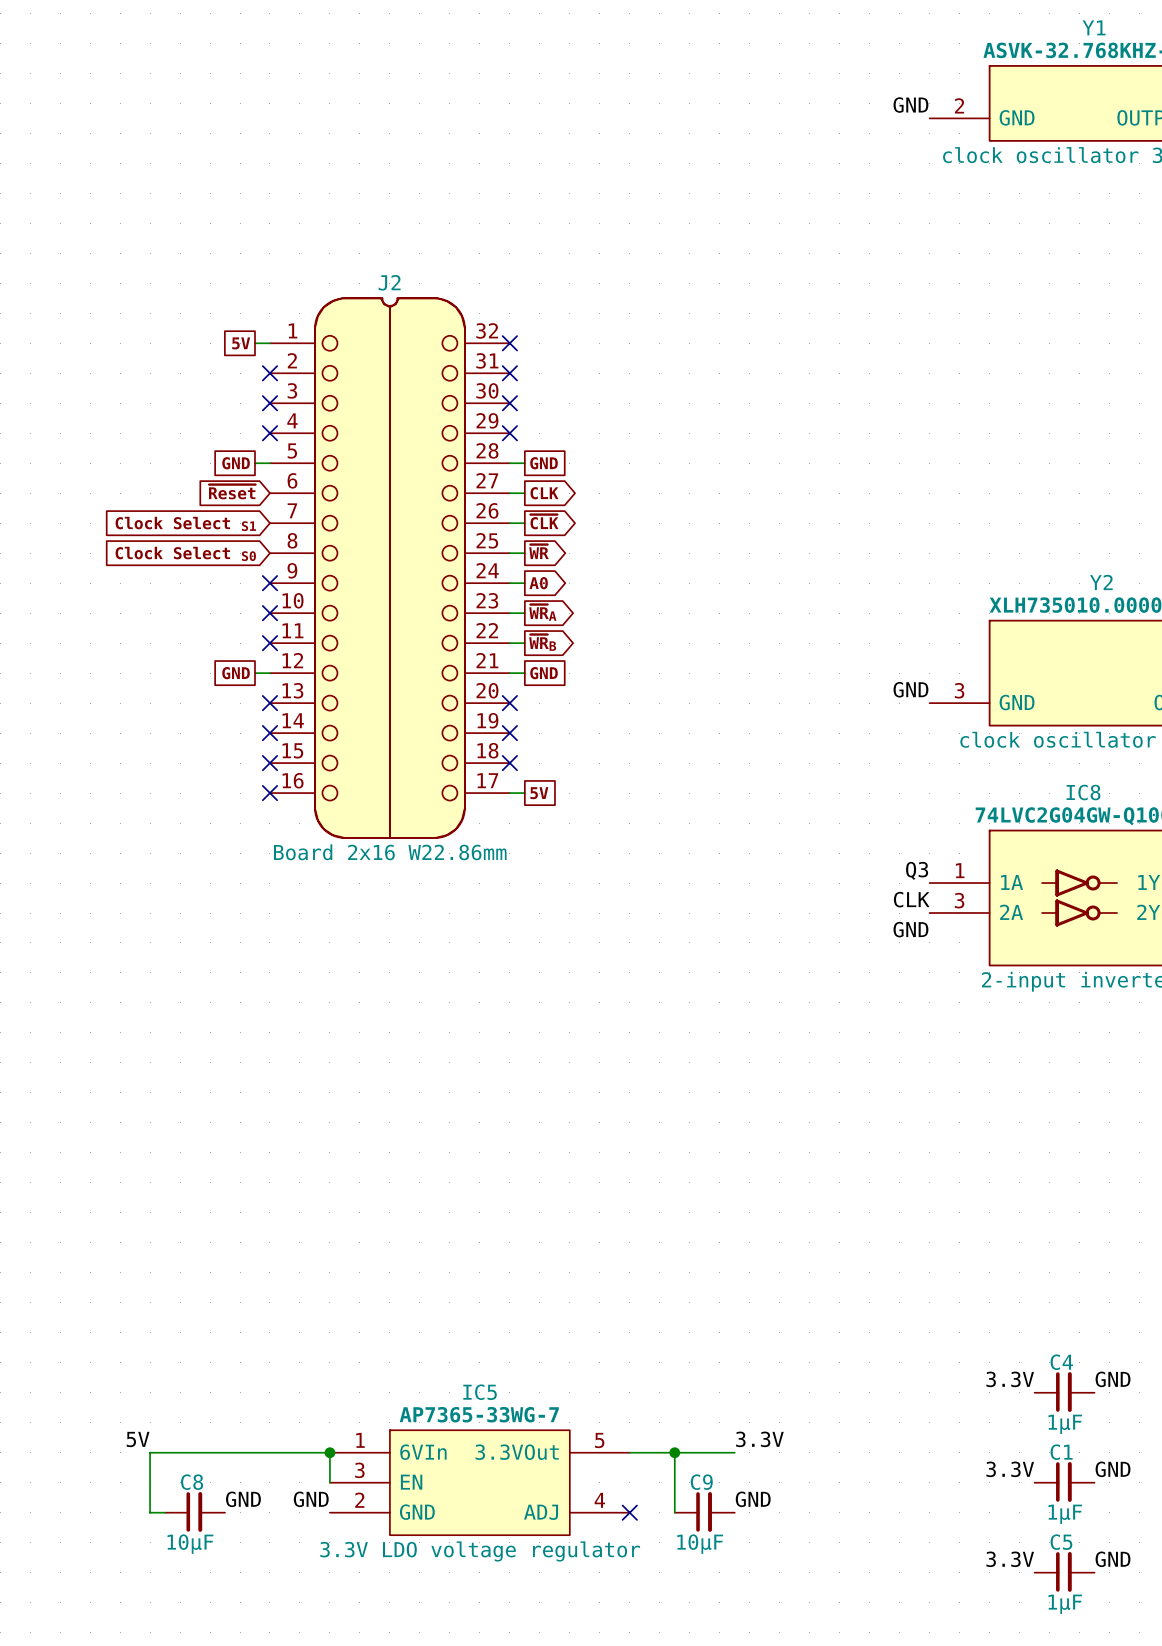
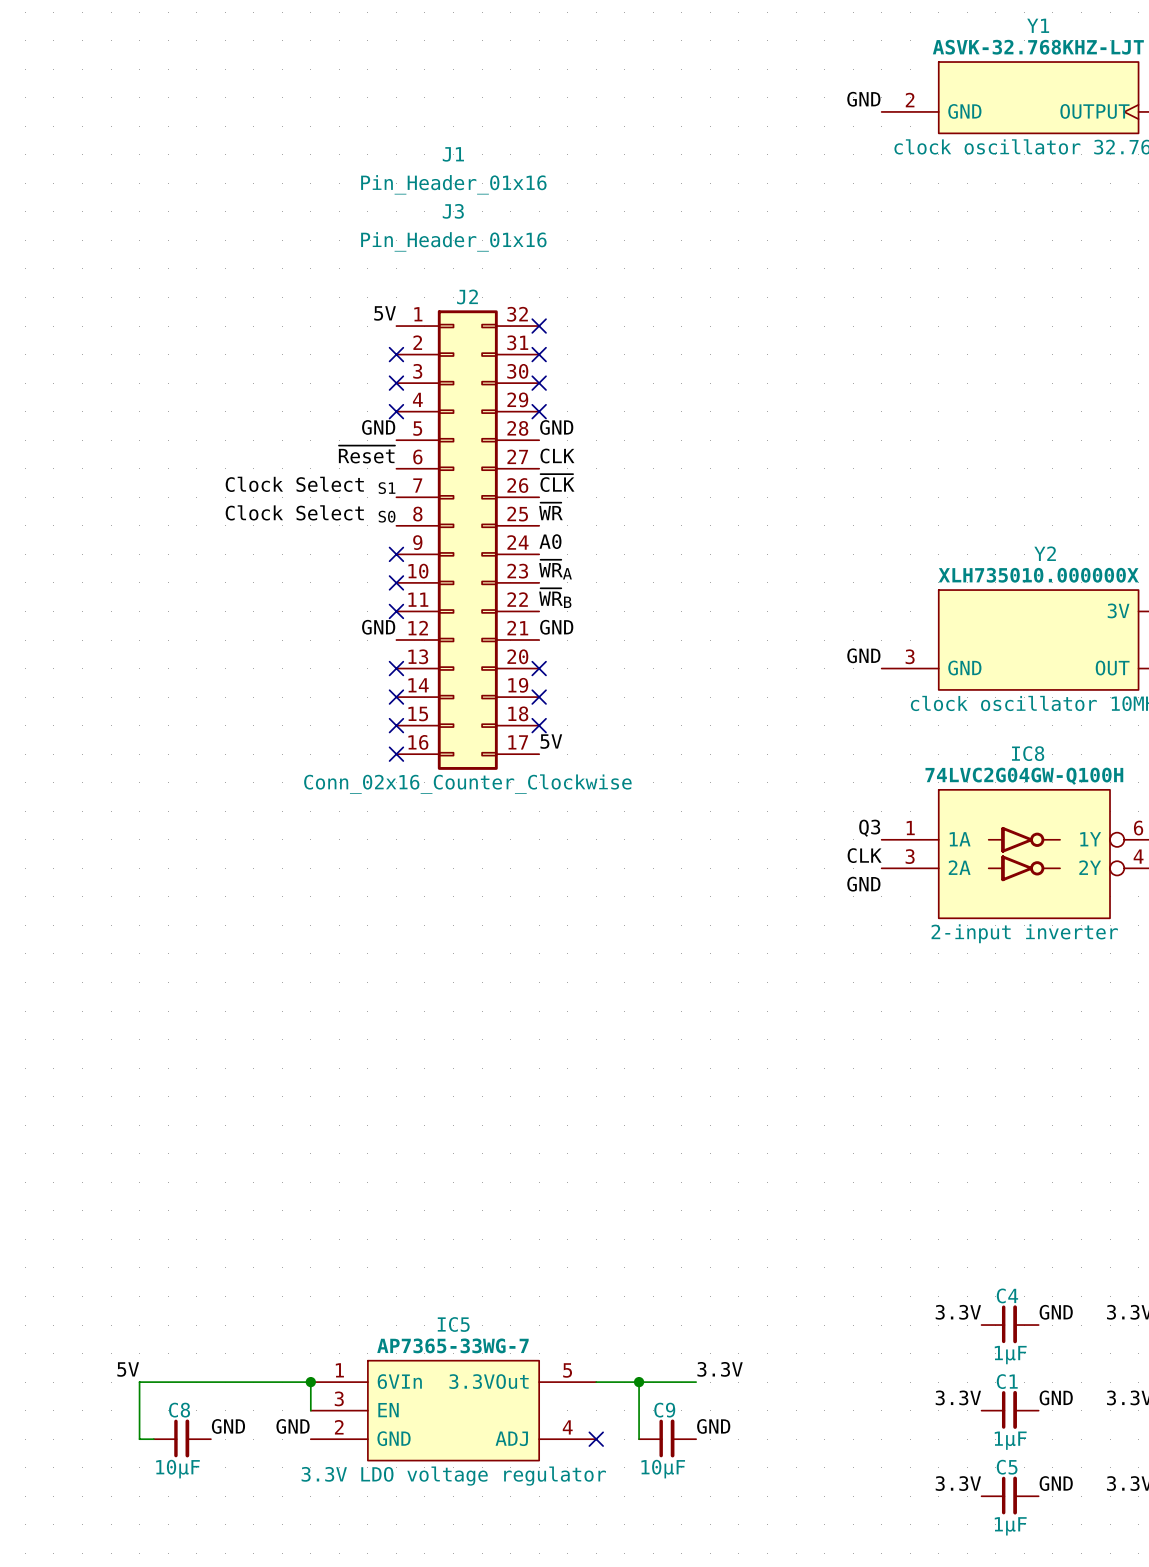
J1: none -> Pin_Header_01x16 (453, 170)
J3: none -> Pin_Header_01x16 (453, 227)
J2 name position: J2 (389, 282) -> J2 (467, 296)
J2 symbol: [269, 298, 510, 839] -> [396, 310, 540, 770]
label: none -> 5V (385, 313)
global label: 5V (241, 343) -> none
wire: (254, 343) (269, 343) -> none
no-connect mark: (509, 343) -> none
no-connect mark: none -> (539, 326)
no-connect mark: (269, 373) -> none
no-connect mark: none -> (396, 354)
no-connect mark: (509, 373) -> none
no-connect mark: none -> (539, 354)
no-connect mark: (269, 403) -> none
no-connect mark: none -> (396, 383)
no-connect mark: (509, 403) -> none
no-connect mark: none -> (539, 383)
no-connect mark: (269, 433) -> none
no-connect mark: none -> (396, 411)
no-connect mark: (509, 433) -> none
no-connect mark: none -> (539, 411)
label: none -> GND (378, 427)
label: none -> GND (556, 427)
global label: GND (236, 463) -> none
wire: (254, 463) (269, 463) -> none
global label: GND (544, 463) -> none
label: none -> ~{Reset} (366, 454)
label: none -> CLK (557, 456)
global label: ~{Reset} (232, 491) -> none
global label: CLK (544, 493) -> none
label: none -> ~{CLK} (557, 483)
label: none -> Clock Select S1 (310, 485)
global label: ~{CLK} (544, 521) -> none
global label: Clock Select S1 (185, 523) -> none
label: none -> ~{WR} (550, 511)
label: none -> Clock Select S0 (310, 513)
global label: ~{WR} (539, 551) -> none
global label: Clock Select S0 (185, 553) -> none
label: none -> A0 (550, 541)
no-connect mark: (269, 583) -> none
no-connect mark: none -> (396, 554)
global label: A0 (538, 583) -> none
label: none -> ~{WR}A (555, 569)
global label: ~{WR}A (542, 612) -> none
no-connect mark: (269, 613) -> none
no-connect mark: none -> (396, 582)
label: none -> ~{WR}B (555, 598)
global label: ~{WR}B (542, 642) -> none
no-connect mark: (269, 643) -> none
no-connect mark: none -> (396, 611)
label: none -> GND (378, 627)
label: none -> GND (556, 627)
global label: GND (236, 673) -> none
wire: (254, 673) (269, 673) -> none
global label: GND (544, 673) -> none
no-connect mark: (269, 703) -> none
no-connect mark: none -> (396, 668)
no-connect mark: (509, 703) -> none
no-connect mark: none -> (539, 668)
no-connect mark: (269, 733) -> none
no-connect mark: none -> (396, 697)
no-connect mark: (509, 733) -> none
no-connect mark: none -> (539, 697)
no-connect mark: (269, 763) -> none
no-connect mark: none -> (396, 725)
no-connect mark: (509, 763) -> none
no-connect mark: none -> (539, 725)
label: none -> 5V (551, 741)
no-connect mark: (269, 793) -> none
no-connect mark: none -> (396, 754)
global label: 5V (539, 793) -> none
J2 value: Board 2x16 W22.86mm (390, 852) -> Conn_02x16_Counter_Clockwise (467, 784)

